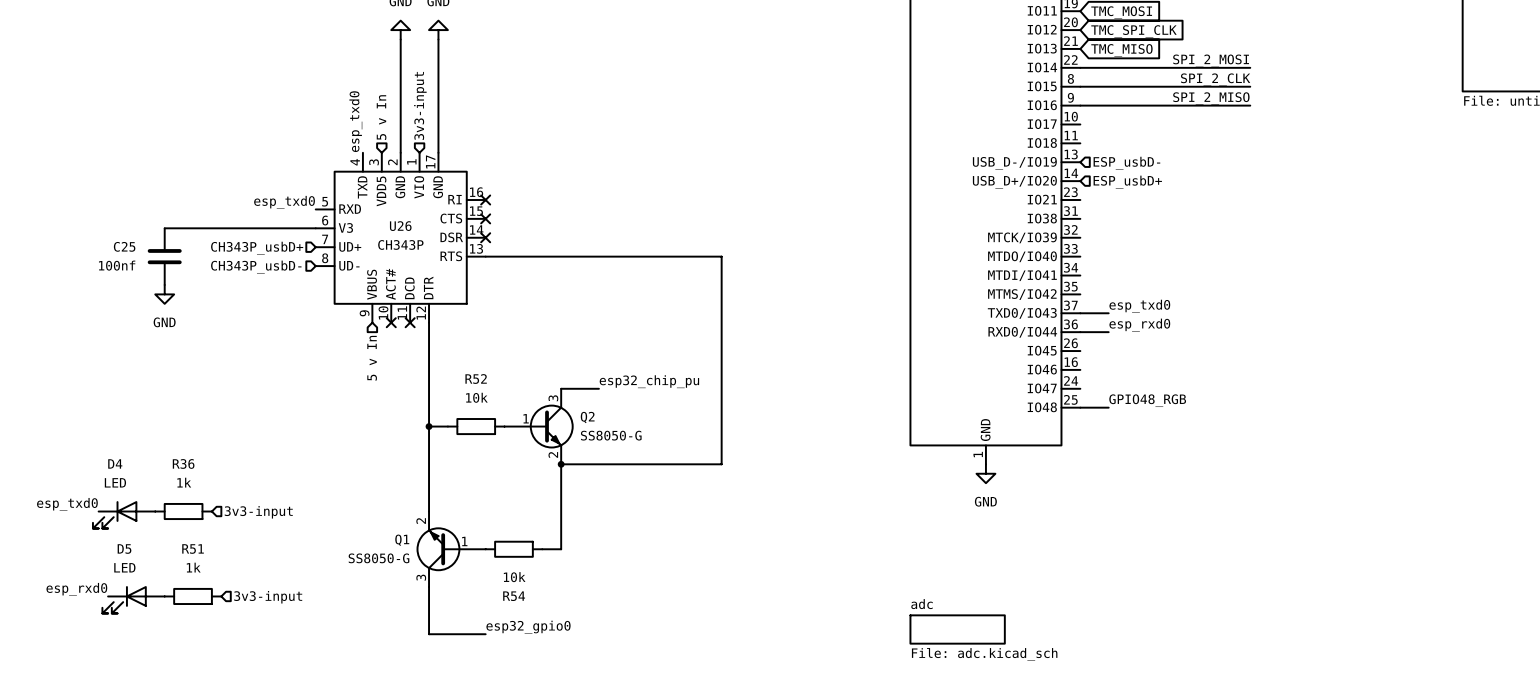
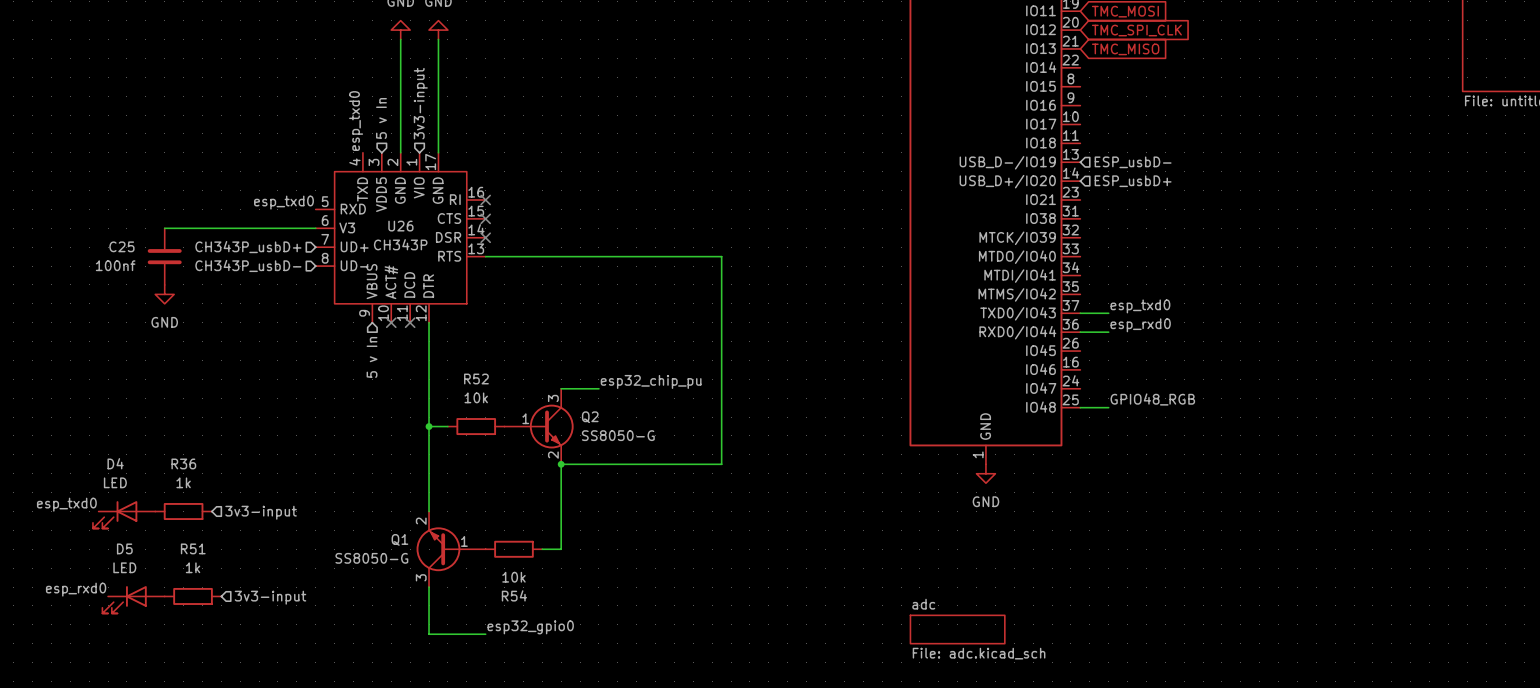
label: SPI_2_MOSI (1211, 60) -> none
wire: (1080, 67) (1250, 67) -> none
label: SPI_2_CLK (1215, 79) -> none
wire: (1080, 86) (1250, 86) -> none
label: SPI_2_MISO (1211, 98) -> none
wire: (1080, 105) (1250, 105) -> none

